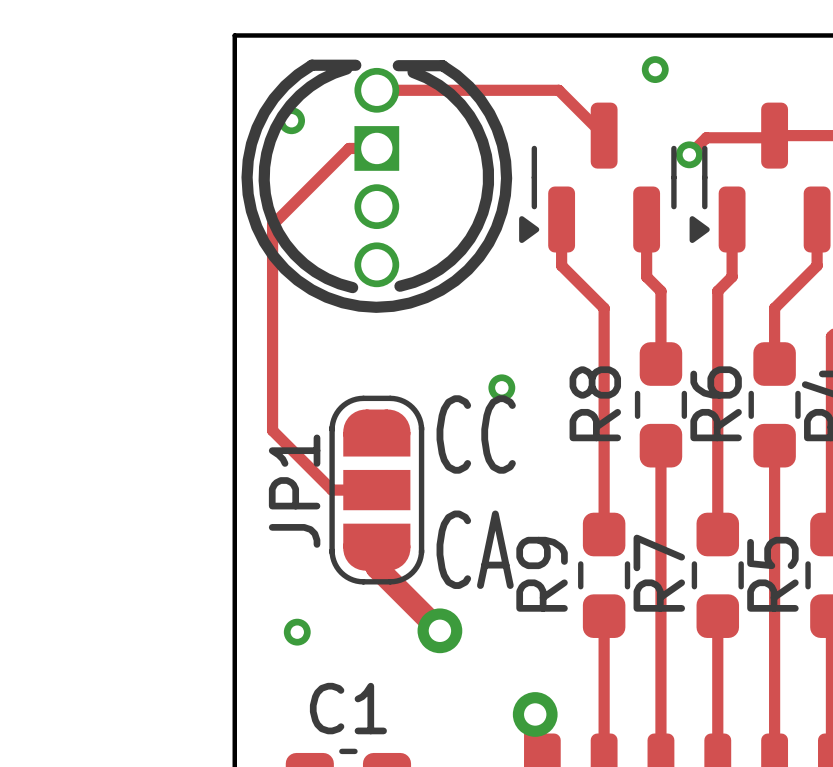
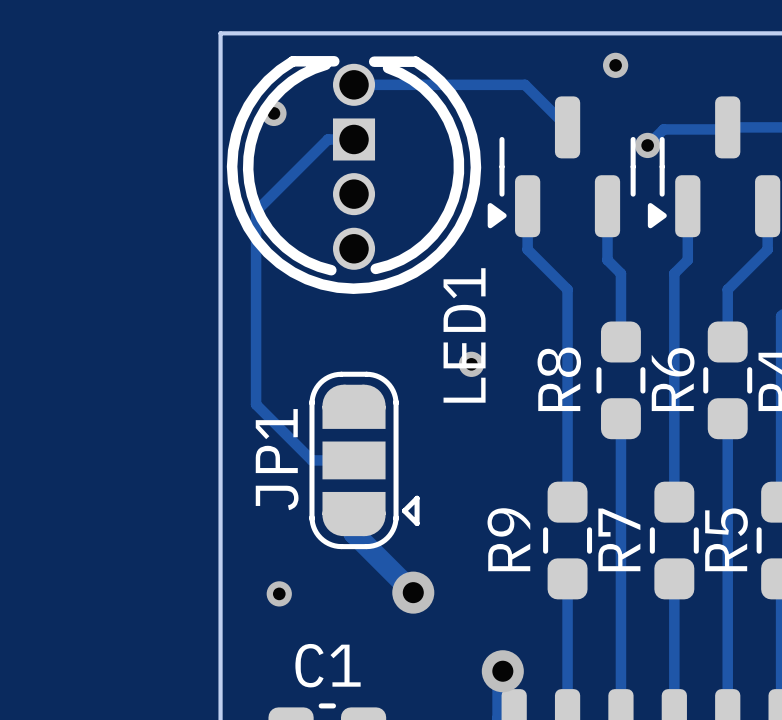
LED1 name: none -> LED1 (464, 335)
JP1 footprint: [329, 395, 425, 585] -> [309, 371, 420, 550]
text: CC (476, 434) -> none
text: CA (475, 549) -> none

